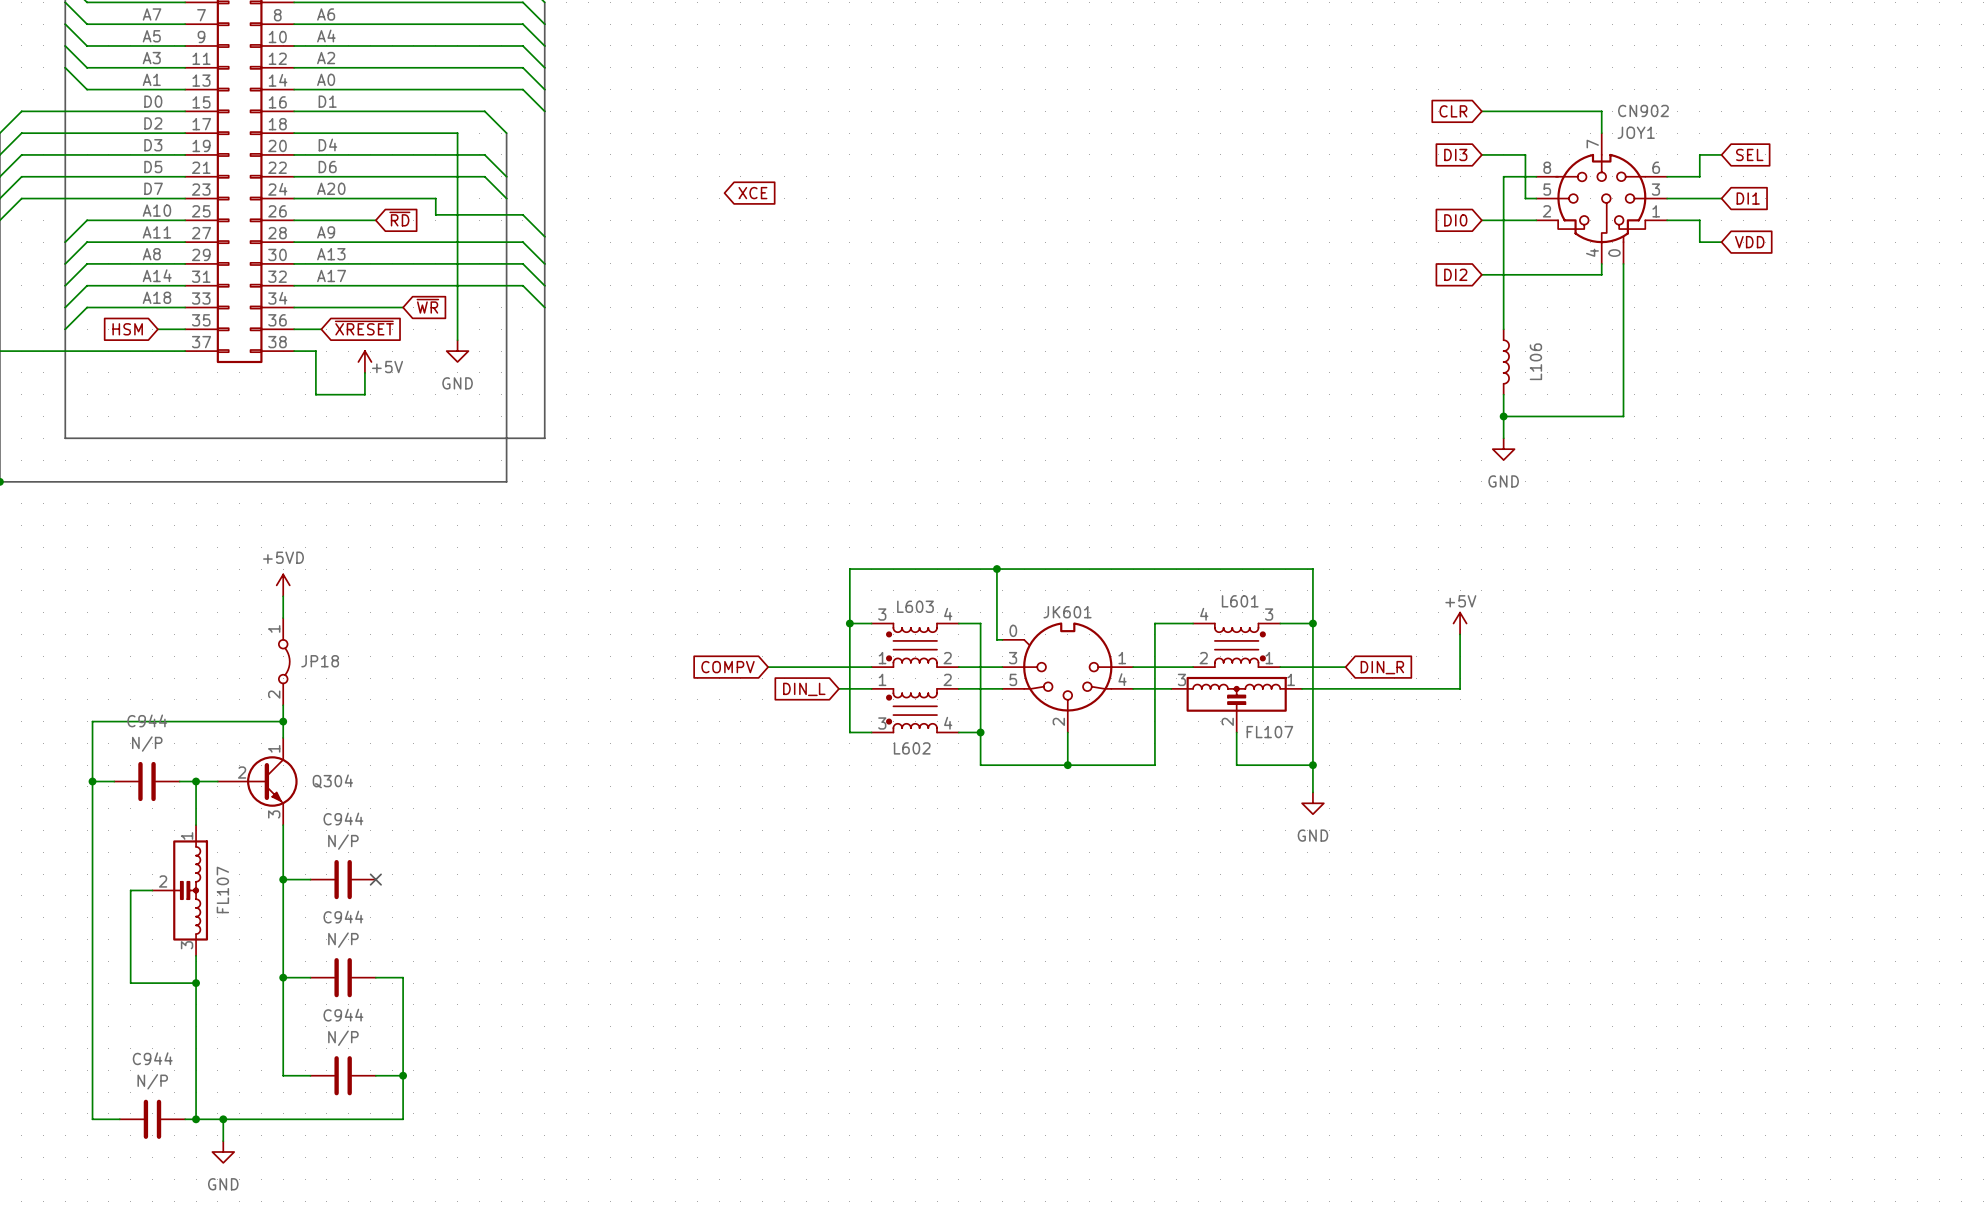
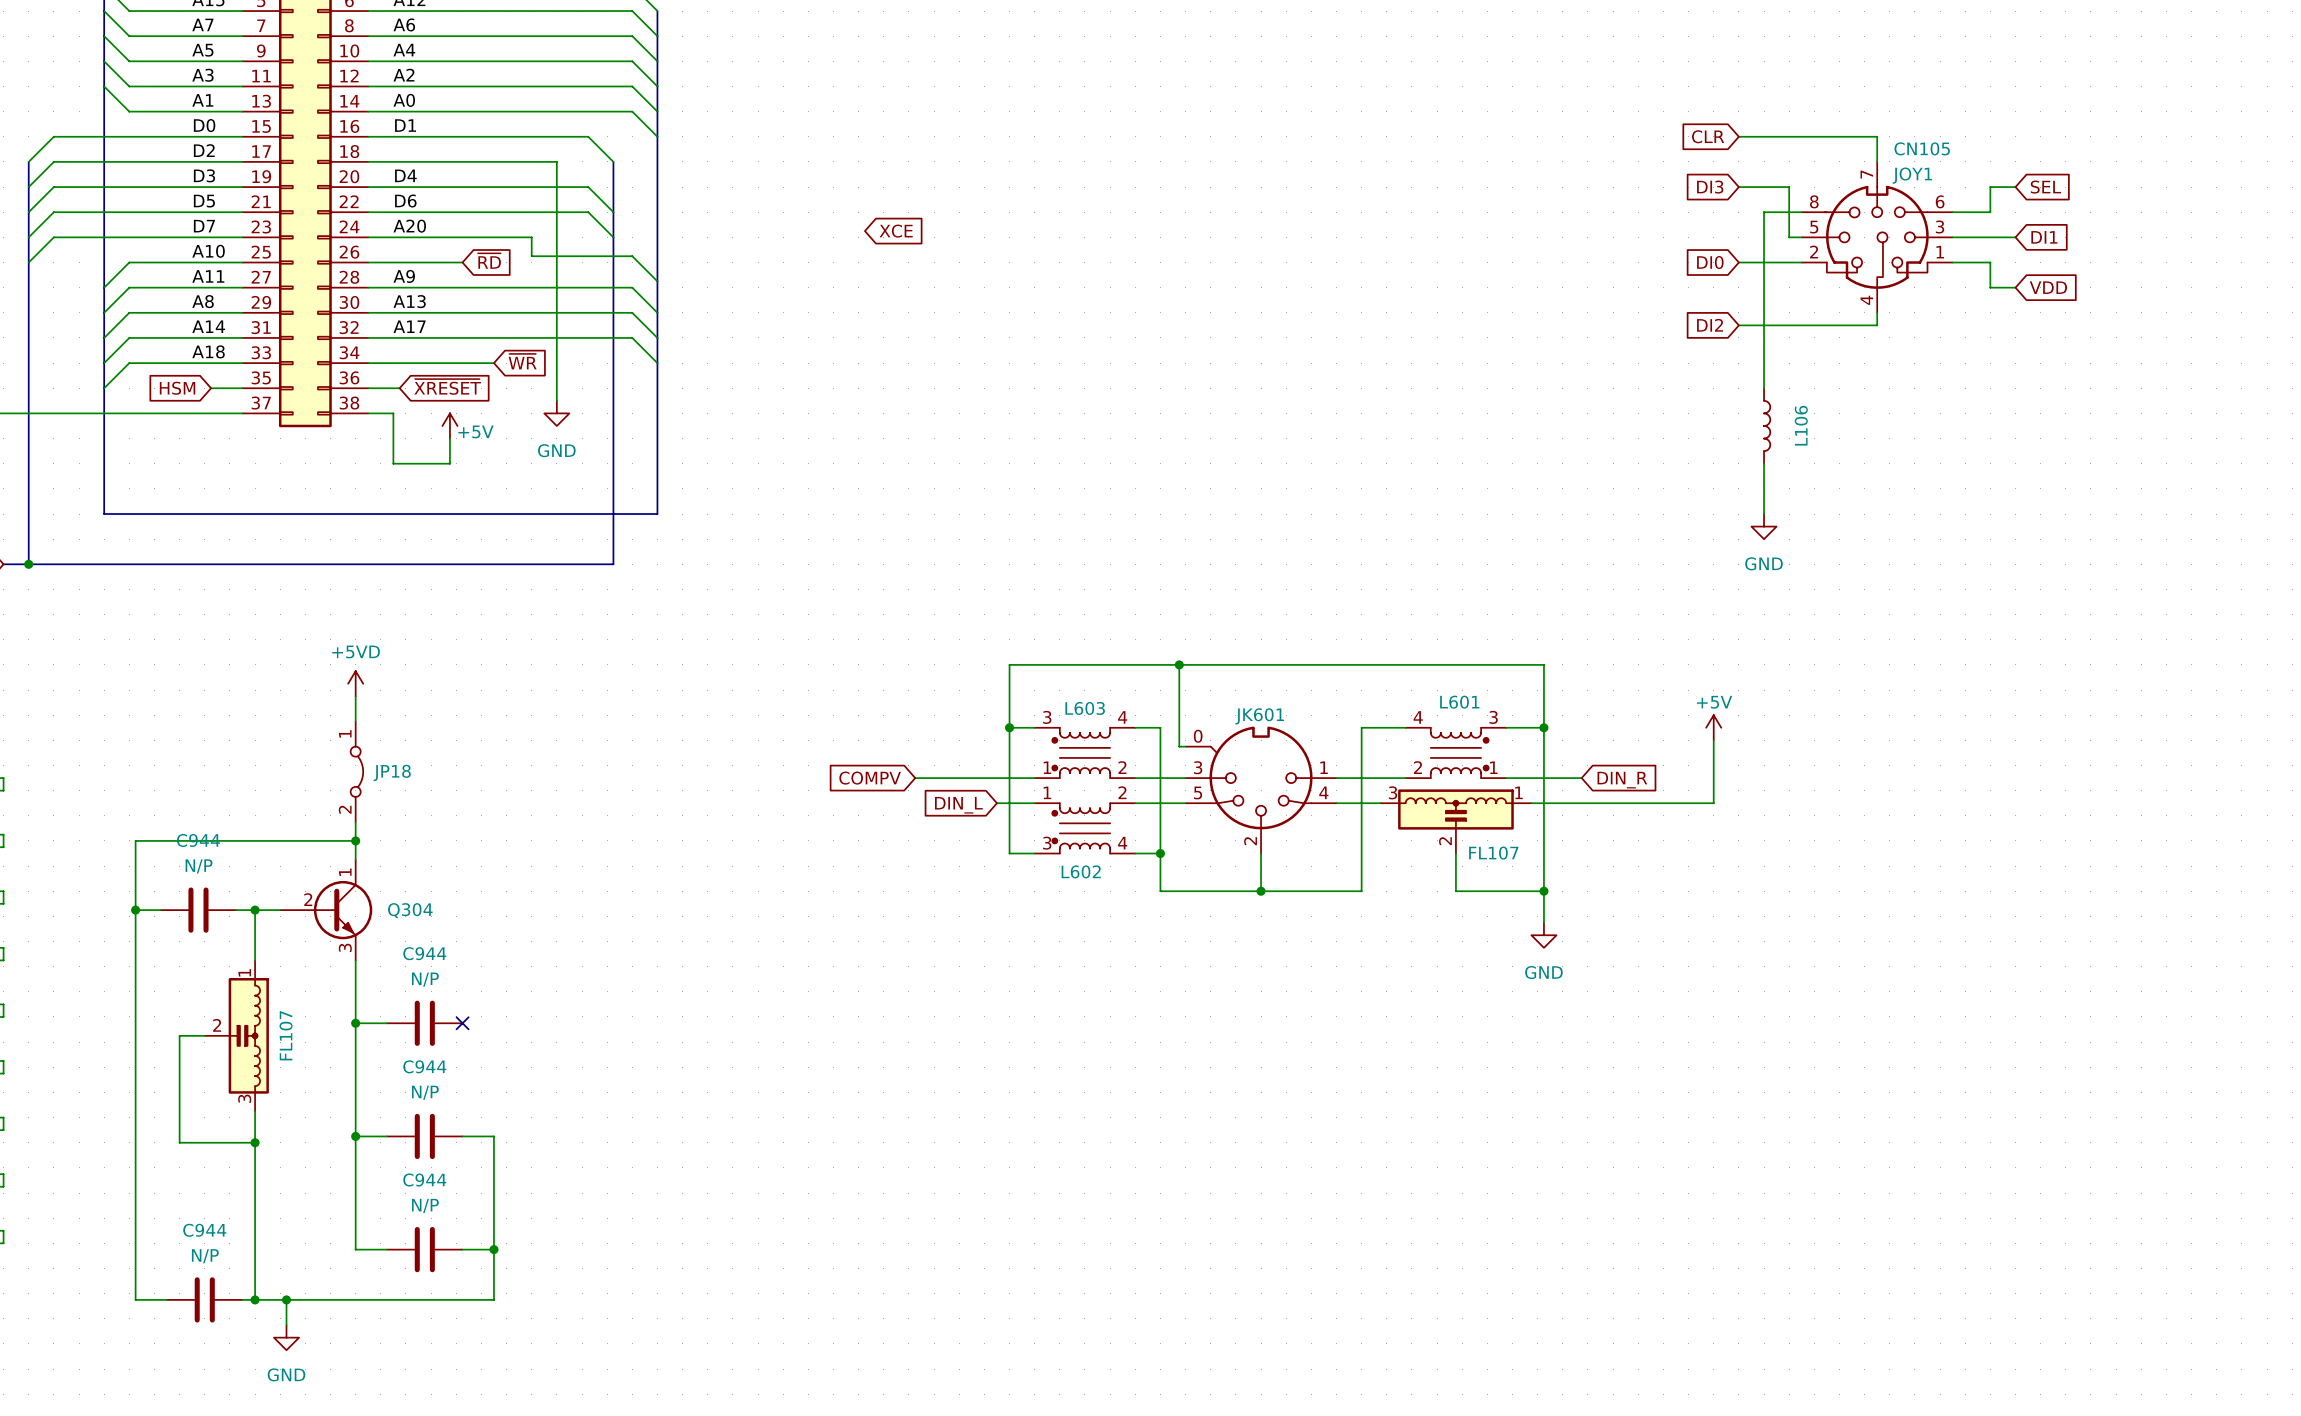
CN902: JOY1 (1601, 198) -> none
CN105: none -> JOY1 (1877, 237)
wire: (1623, 263) (1623, 416) (1503, 416) -> none
junction: (1503, 416) -> none

